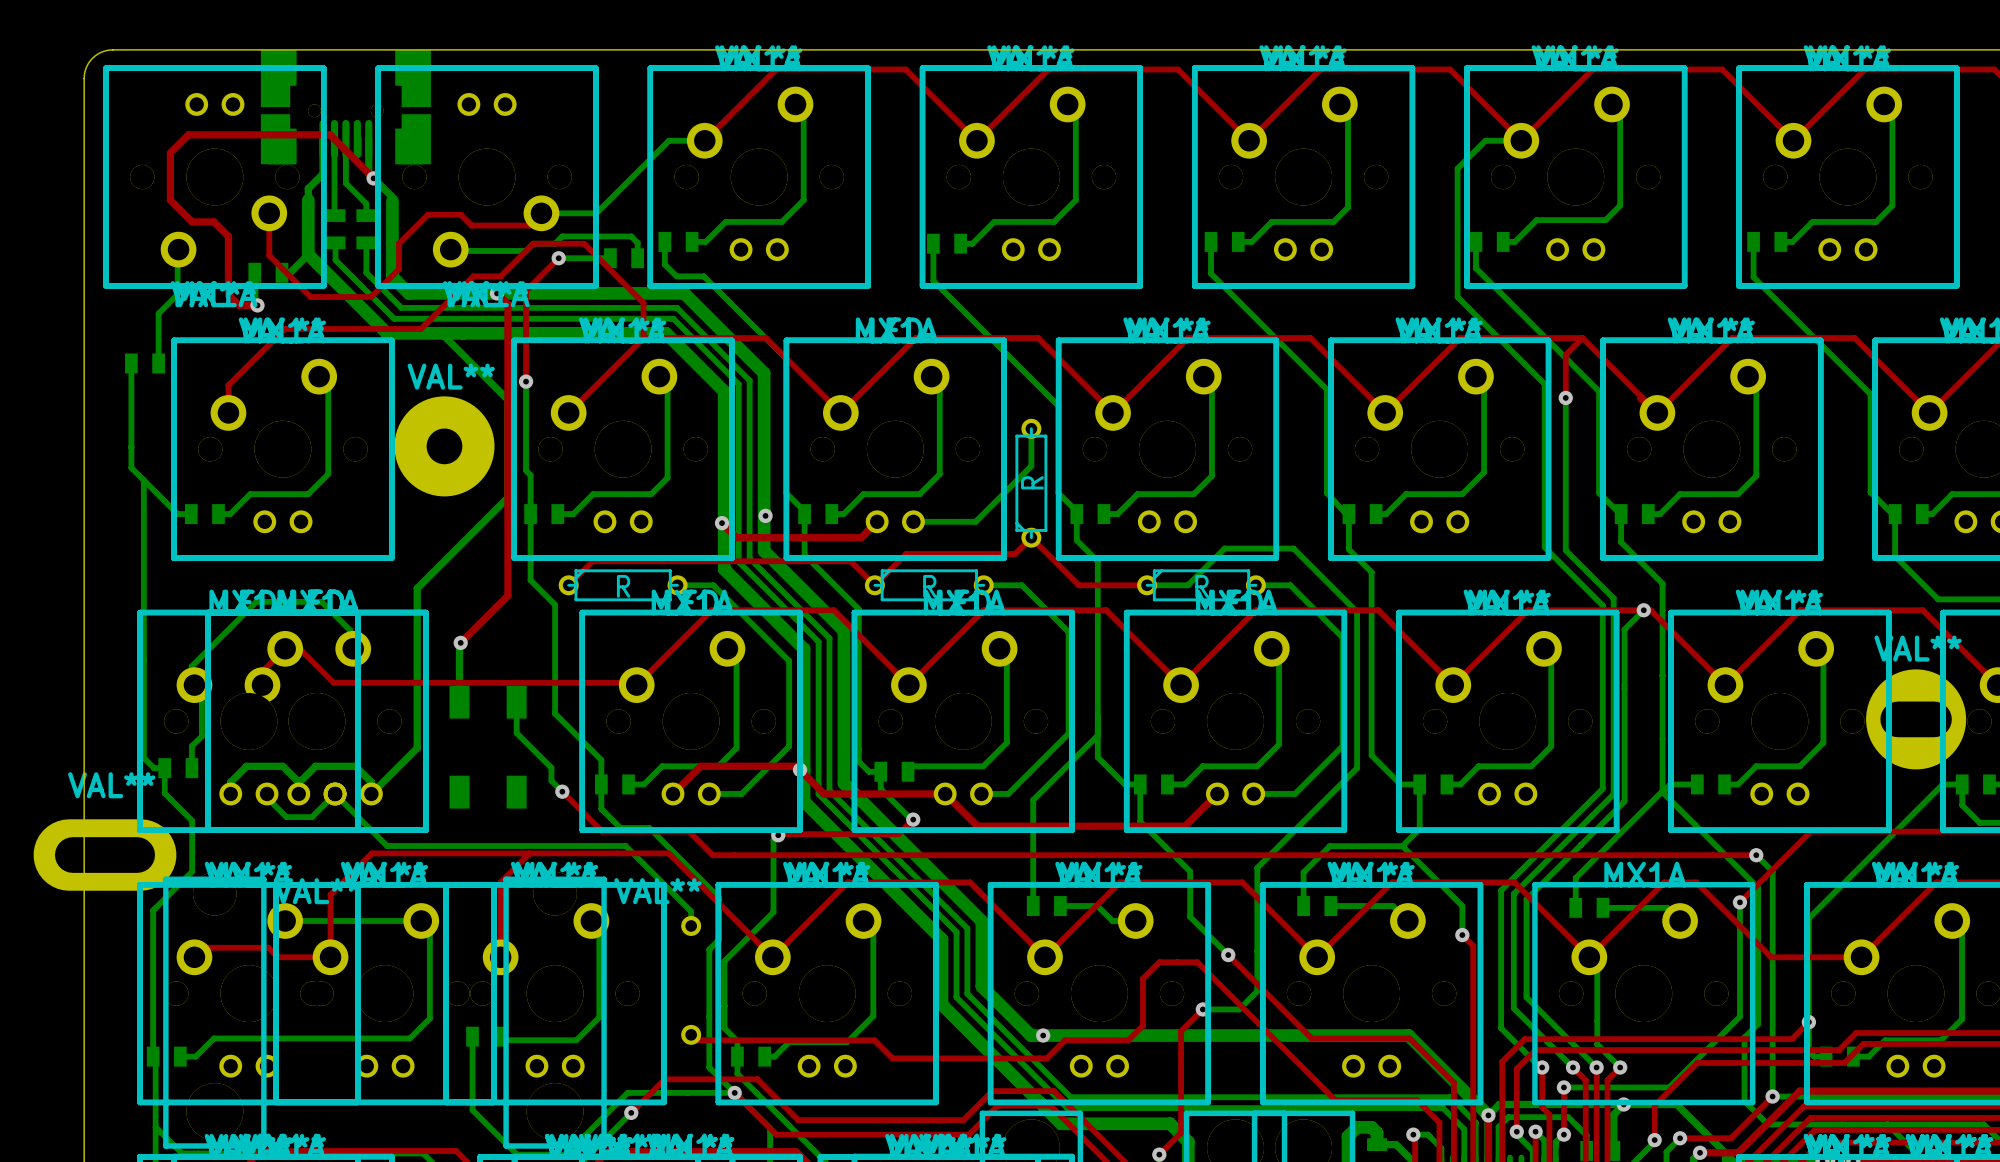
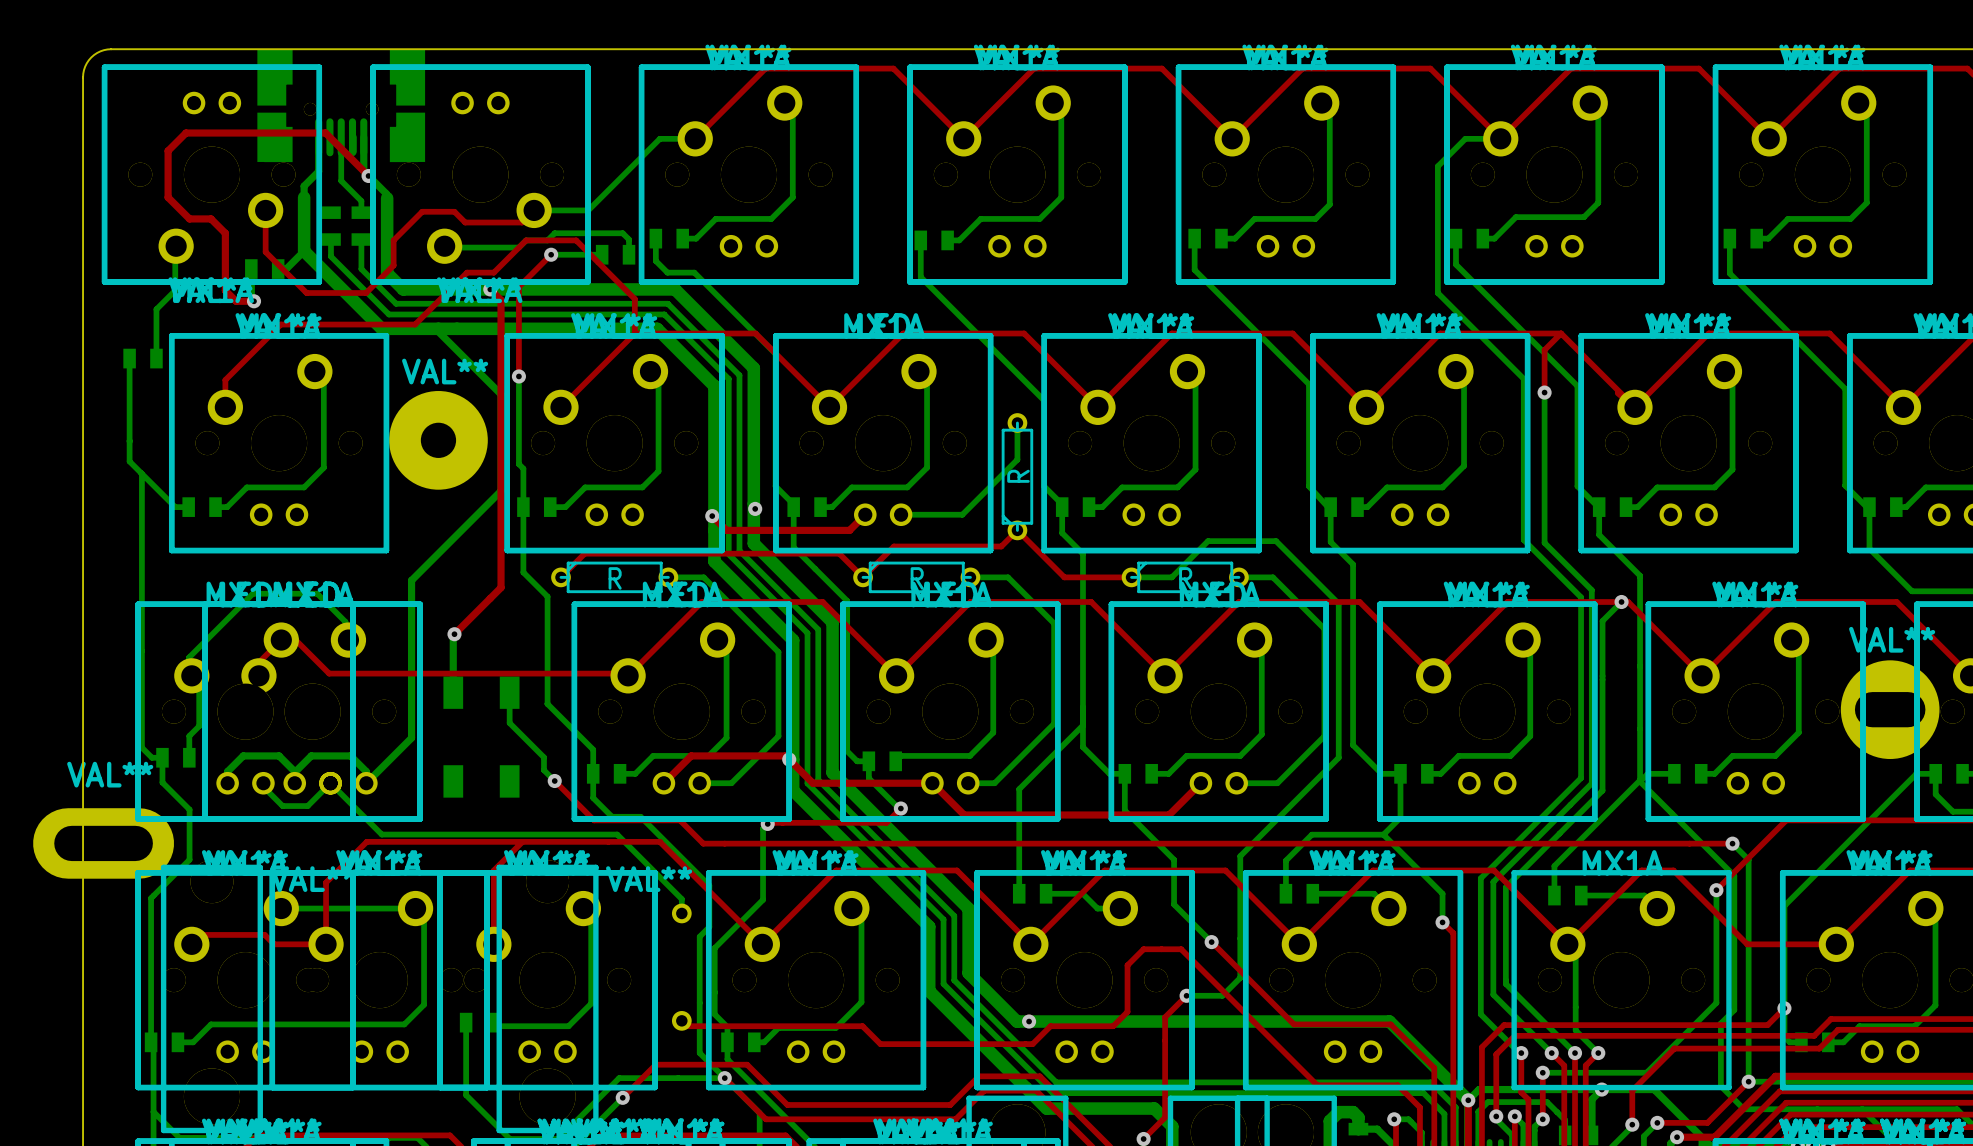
bottom track: (334, 139) (335, 215) -> none

